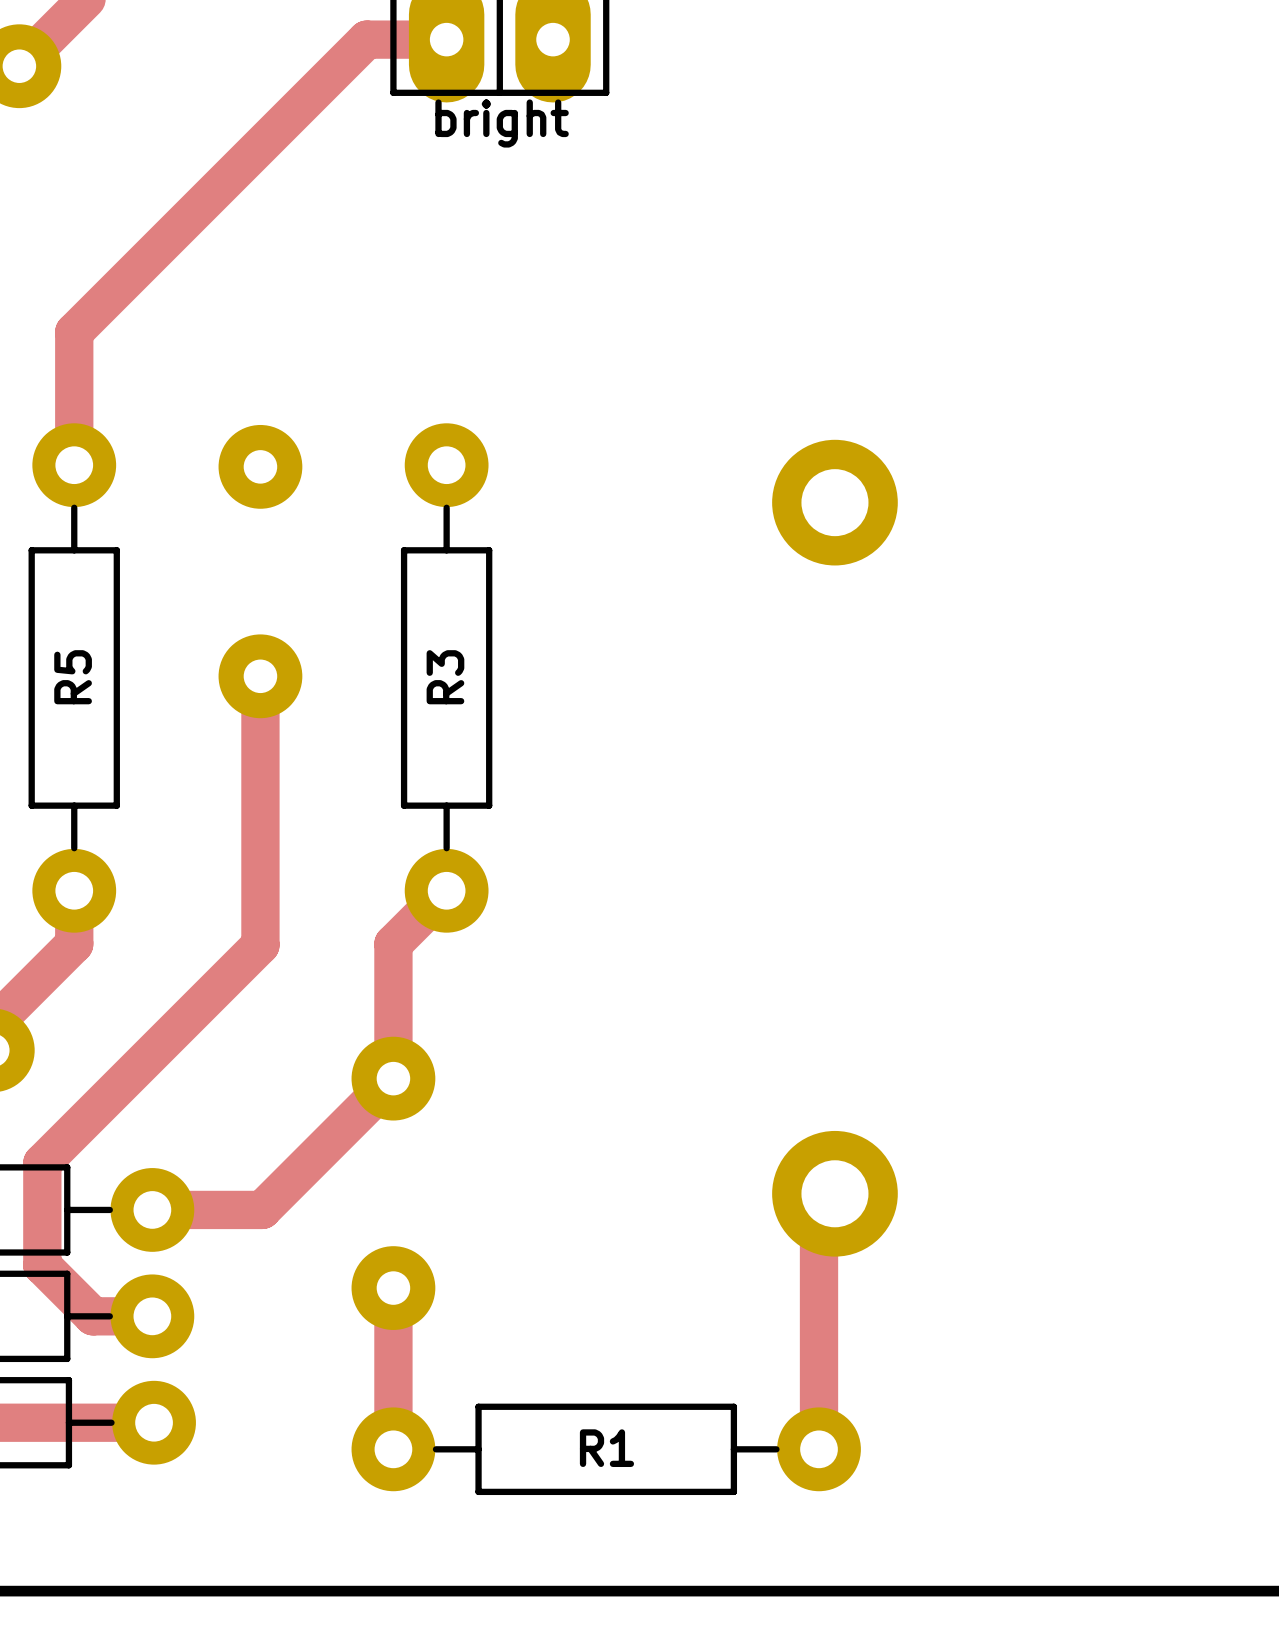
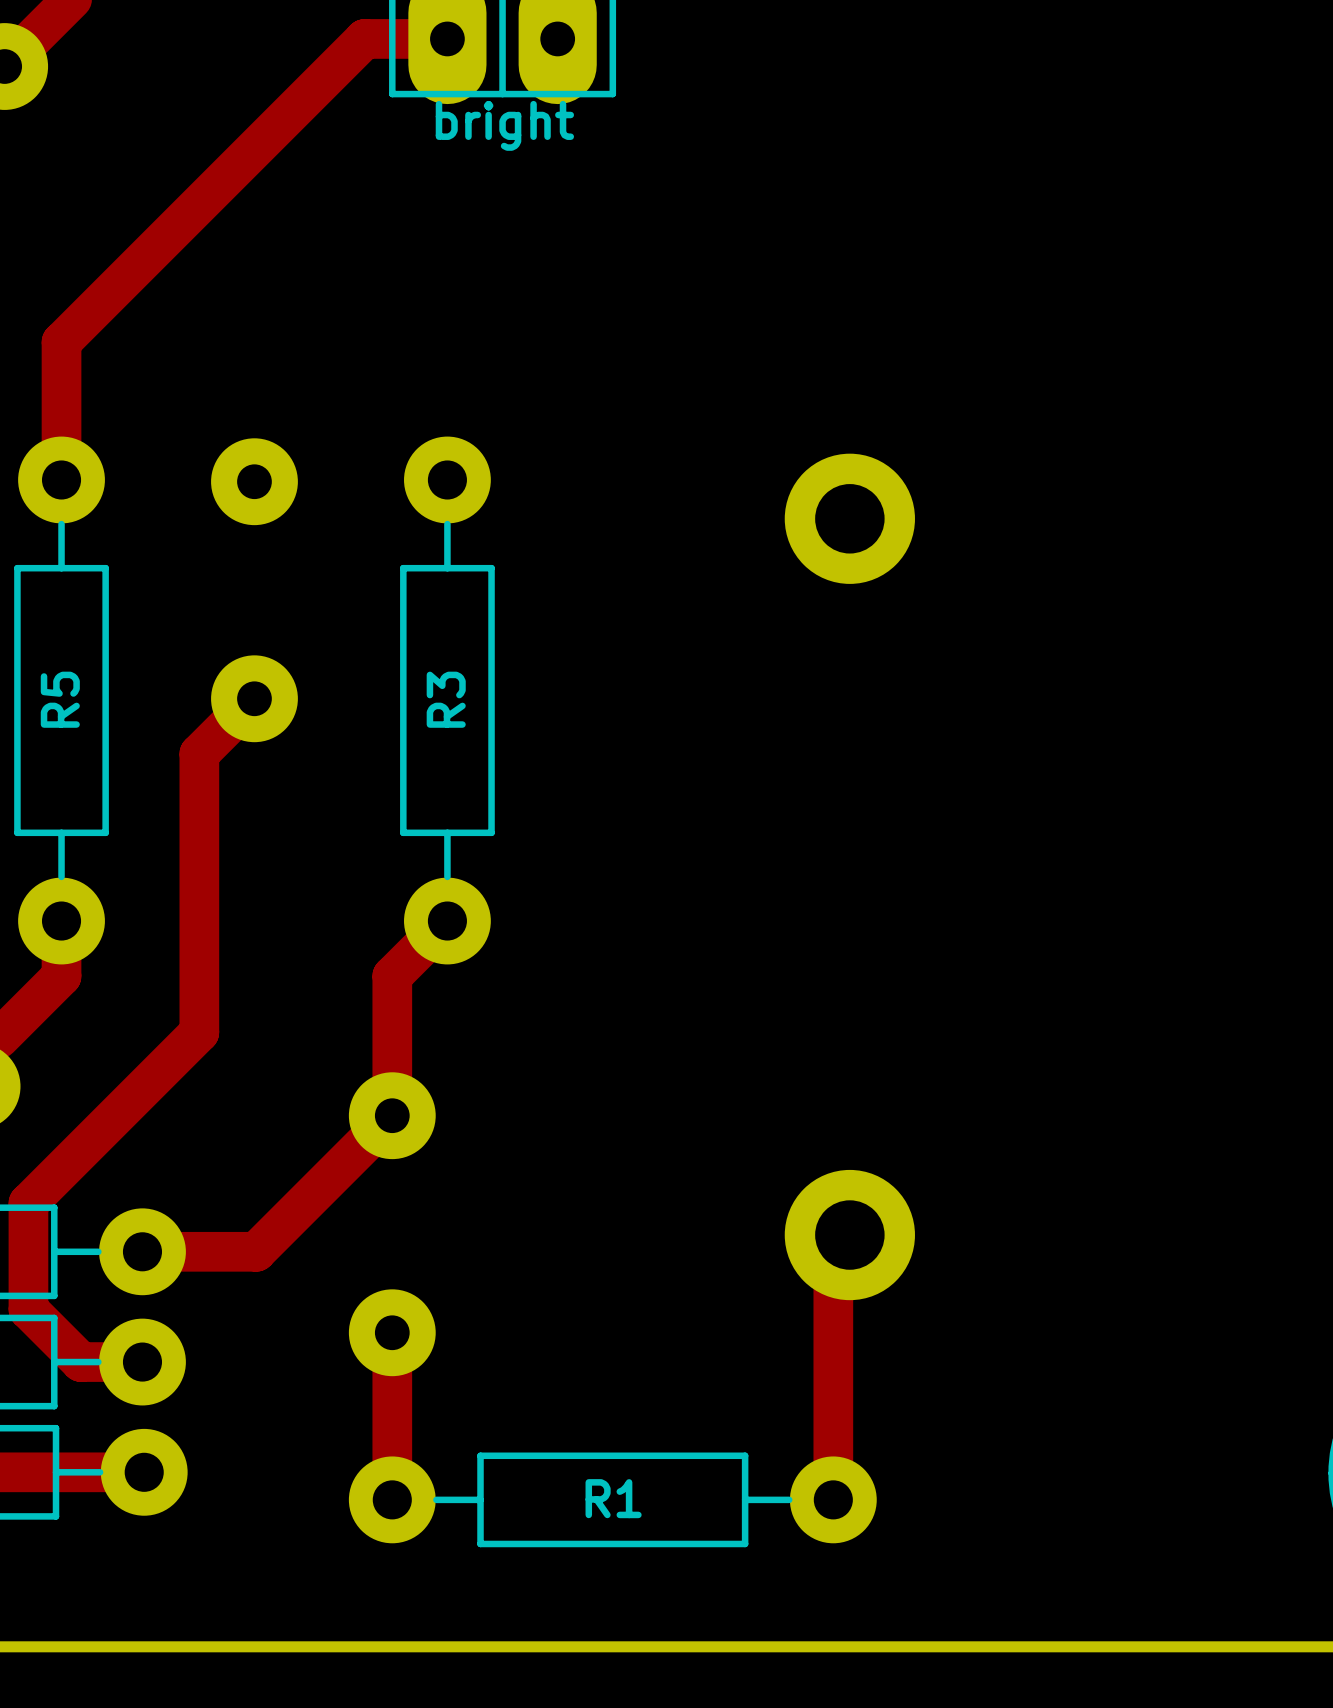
top track: (260, 676) (260, 945) (207, 998) -> (254, 698) (199, 753) (199, 1032)

